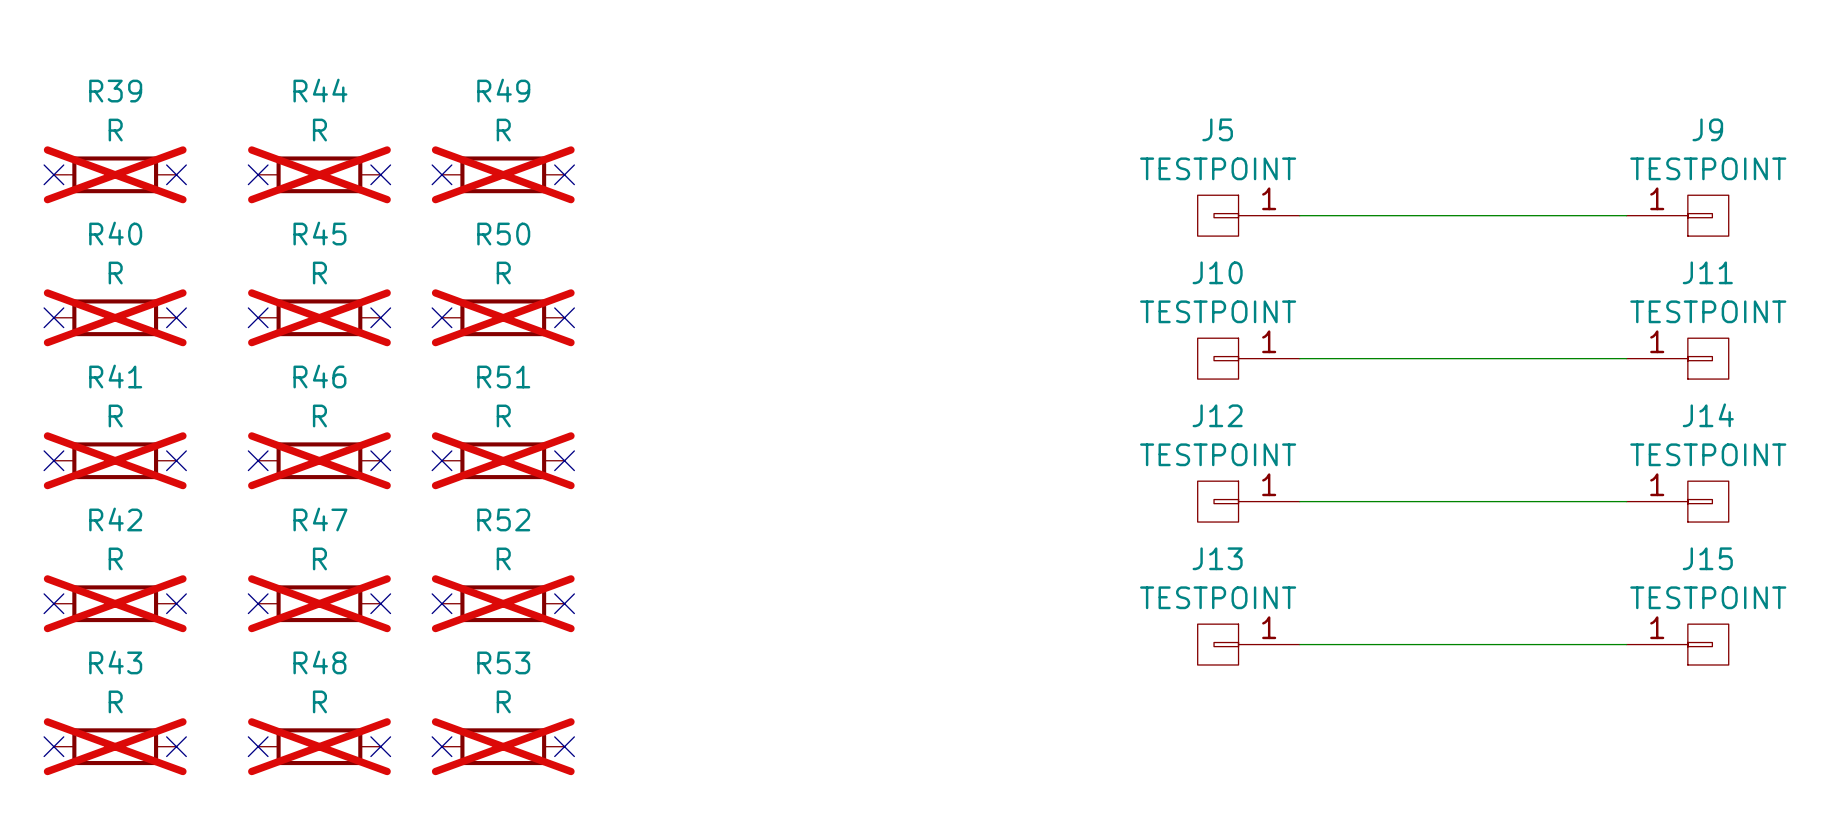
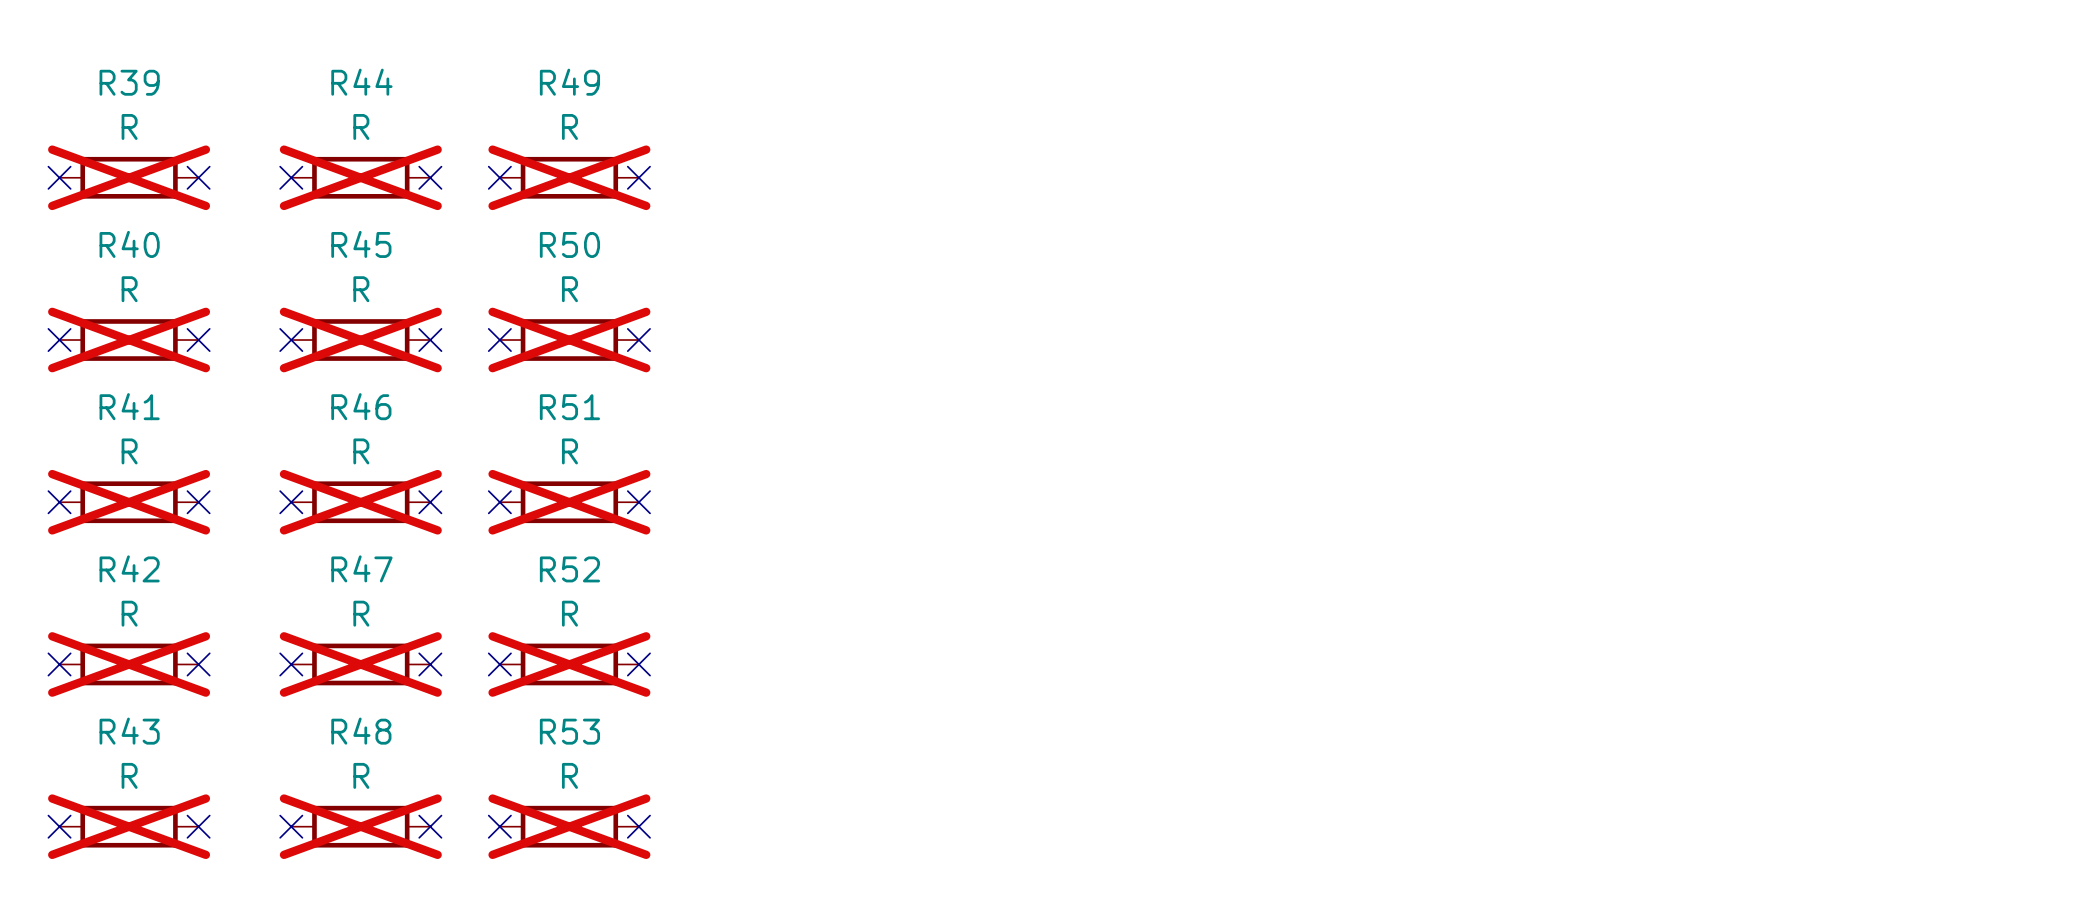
J5: TESTPOINT (1248, 215) -> none
wire: (1299, 215) (1626, 215) -> none
J9: TESTPOINT (1677, 215) -> none
J10: TESTPOINT (1248, 358) -> none
wire: (1299, 358) (1626, 358) -> none
J11: TESTPOINT (1677, 358) -> none
J12: TESTPOINT (1248, 501) -> none
wire: (1299, 501) (1626, 501) -> none
J14: TESTPOINT (1677, 501) -> none
J13: TESTPOINT (1248, 644) -> none
wire: (1299, 644) (1626, 644) -> none
J15: TESTPOINT (1677, 644) -> none

